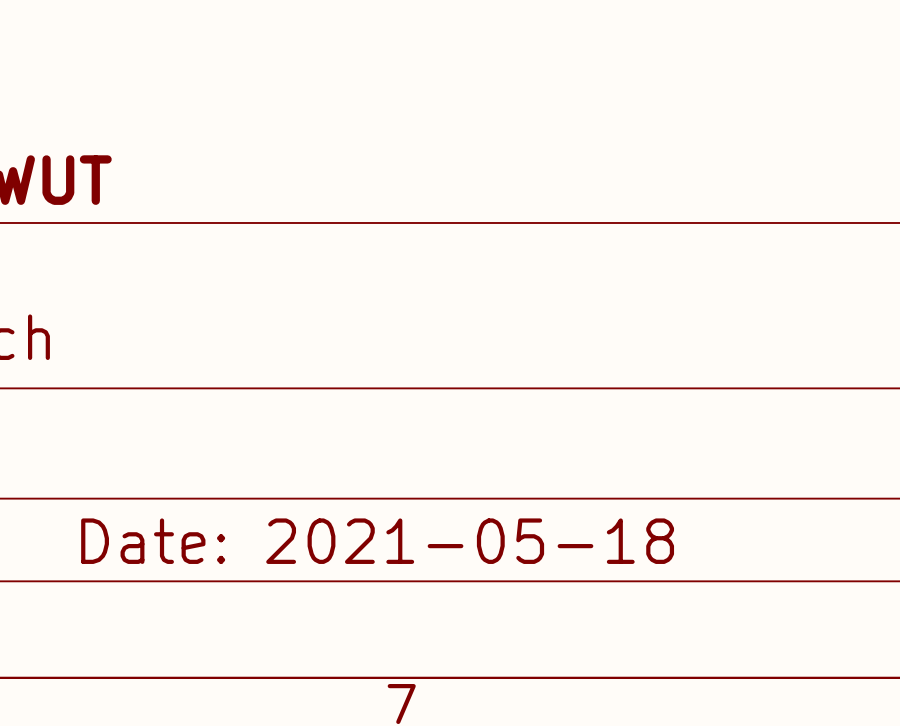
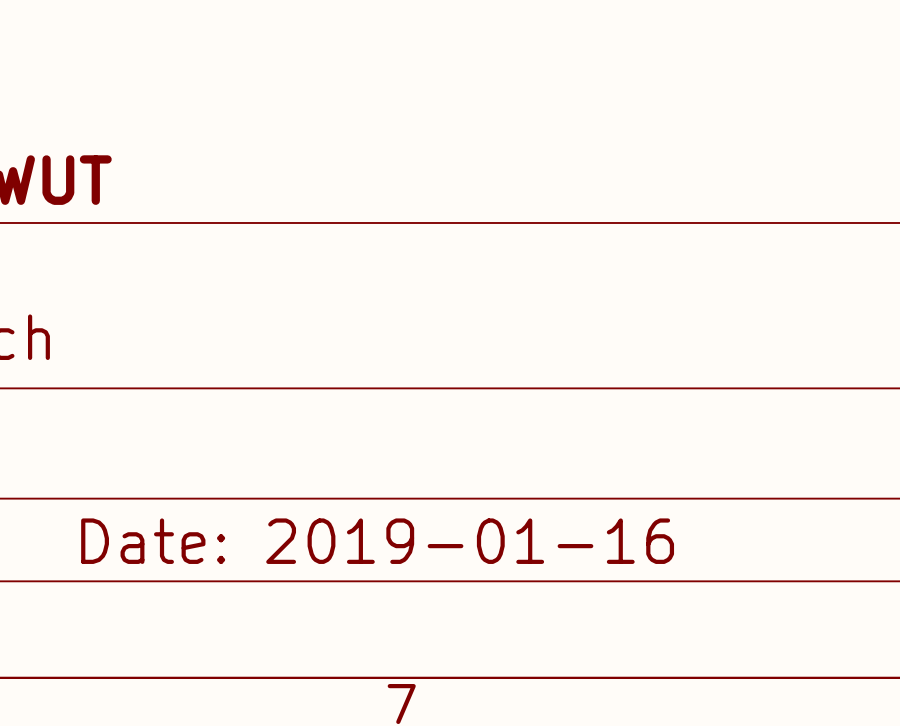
title block: Date: 2021-05-18 (377, 541) -> Date: 2019-01-16 (377, 541)

